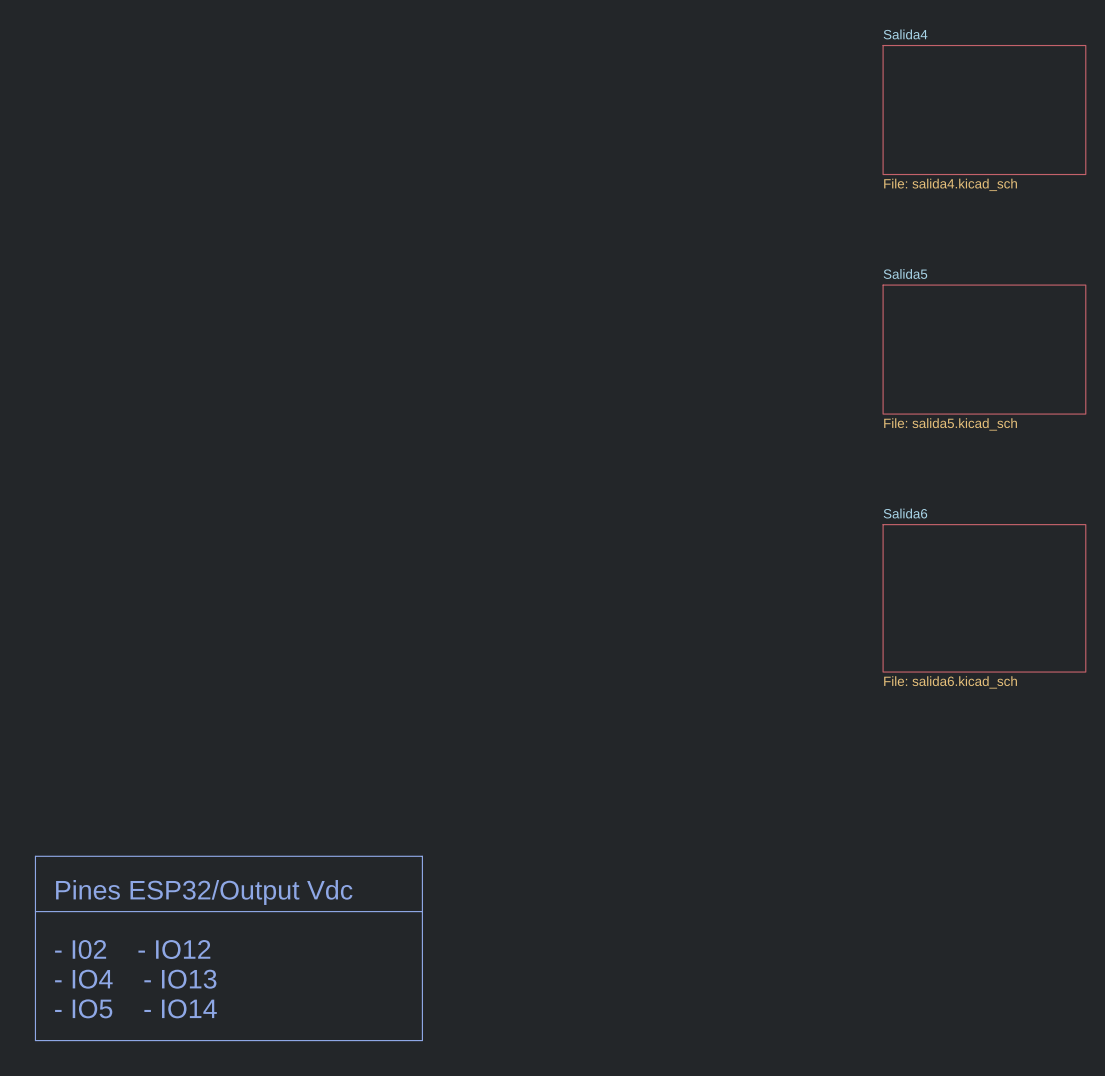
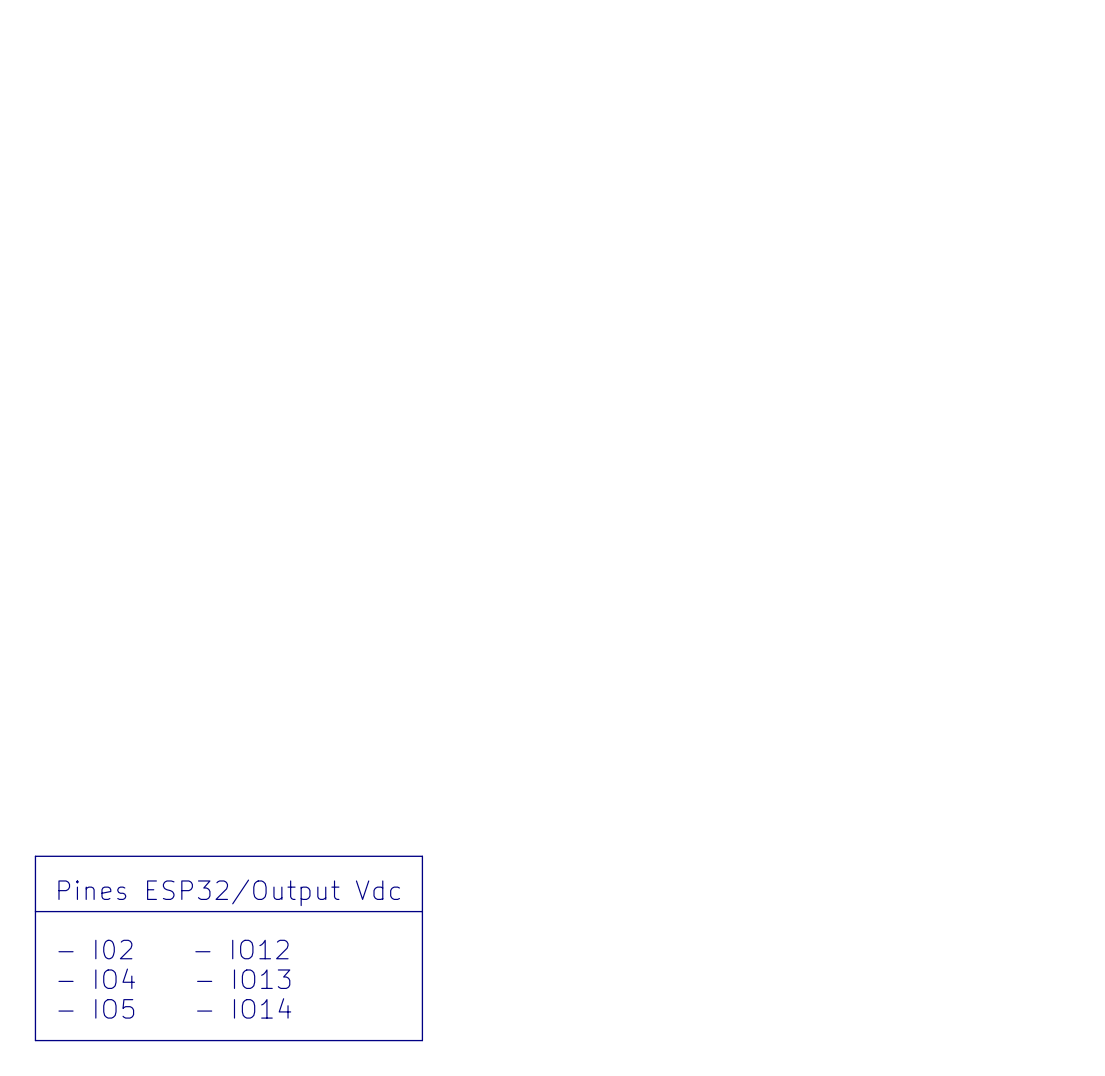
sheet Salida4: File: salida4.kicad_sch (984, 110) -> none
sheet Salida5: File: salida5.kicad_sch (984, 349) -> none
sheet Salida6: File: salida6.kicad_sch (984, 598) -> none

